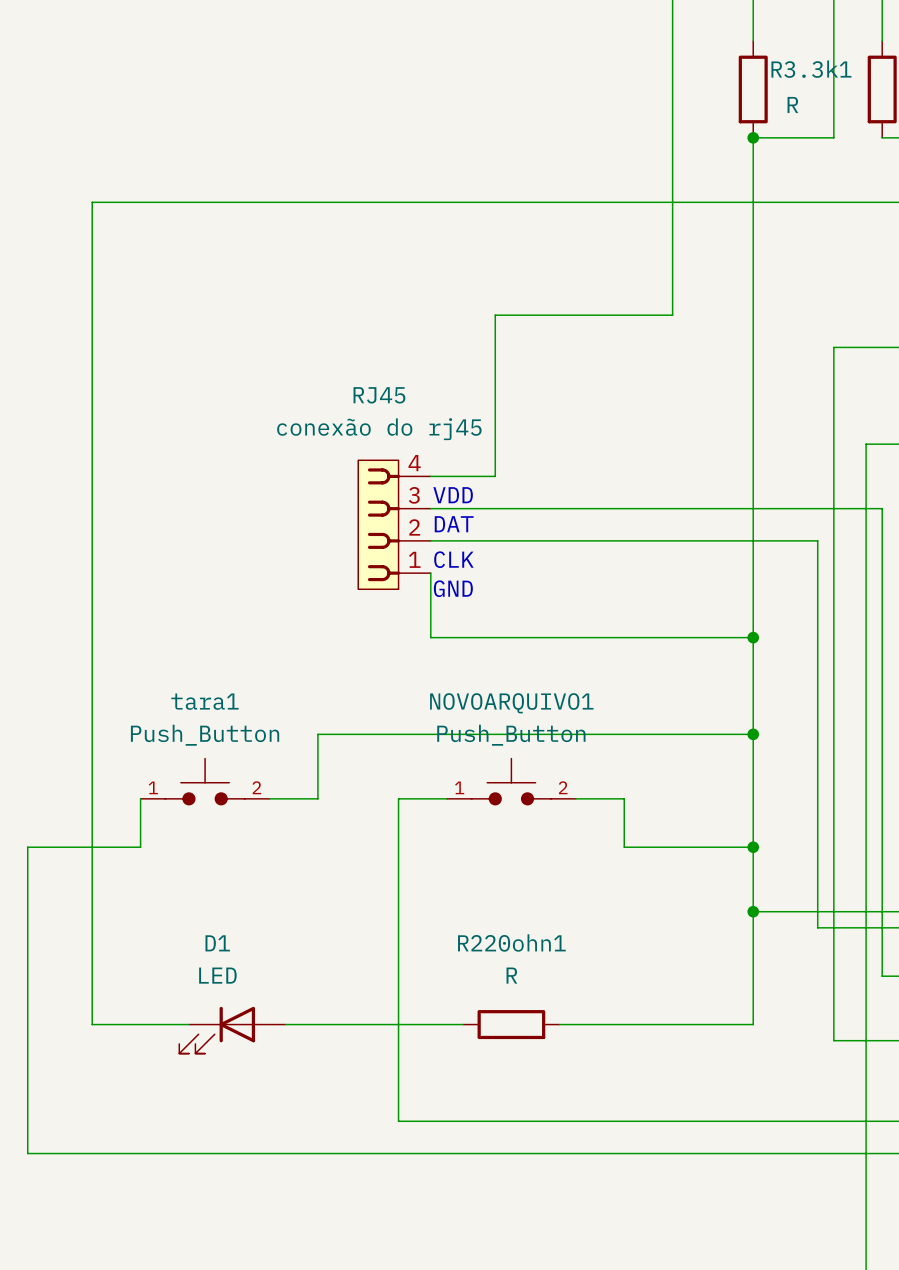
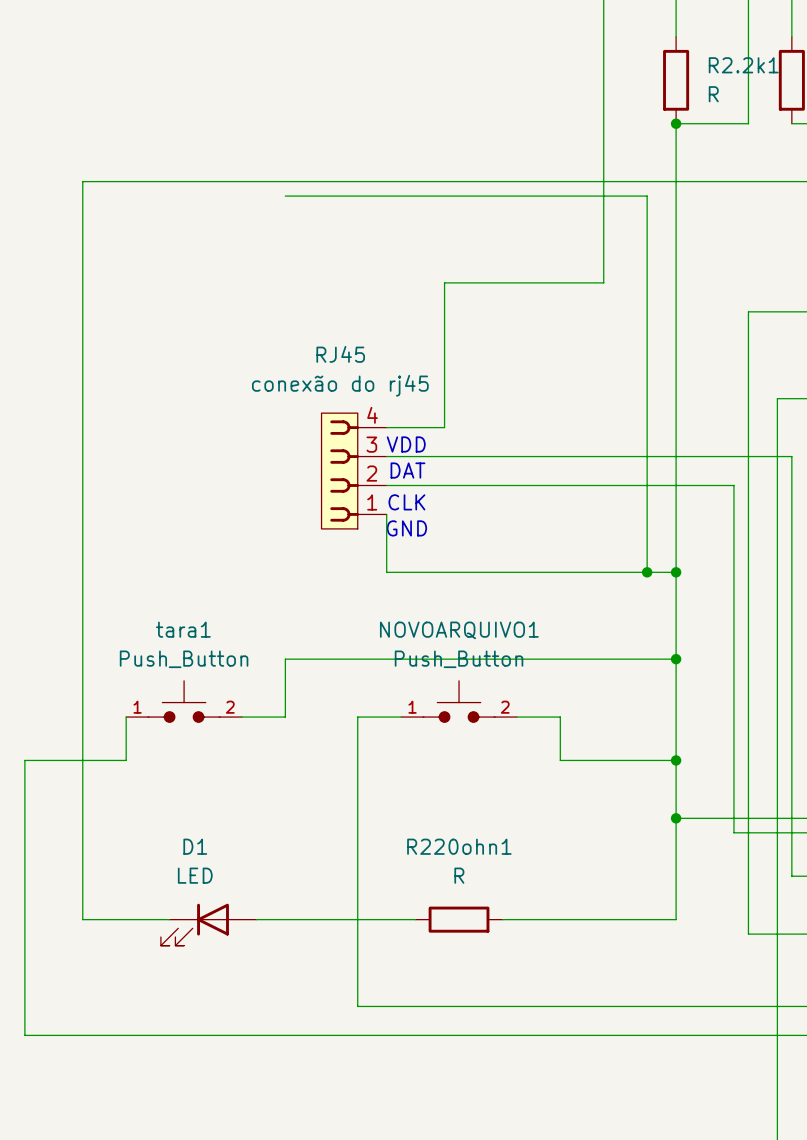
R3.3k1 name: R3.3k1 (811, 69) -> R2.2k1 (743, 65)
wire: none -> (285, 196) (647, 196) (647, 572)
junction: none -> (647, 572)

